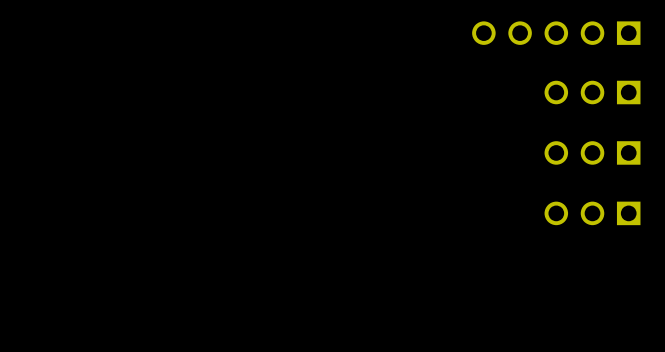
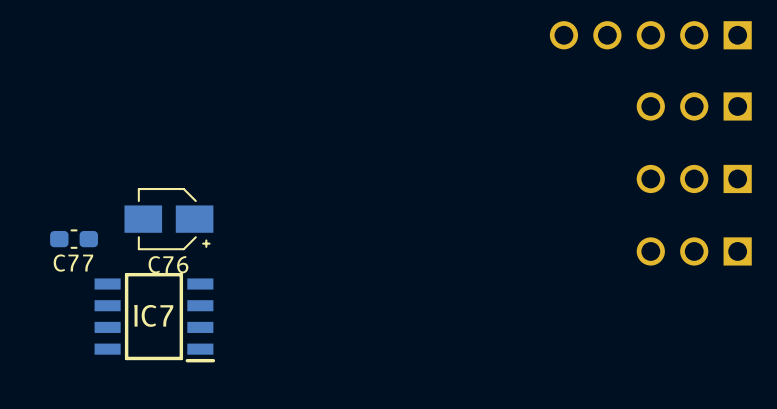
C76: none -> (168, 219)
C77: none -> (74, 239)
IC7: none -> (154, 317)

